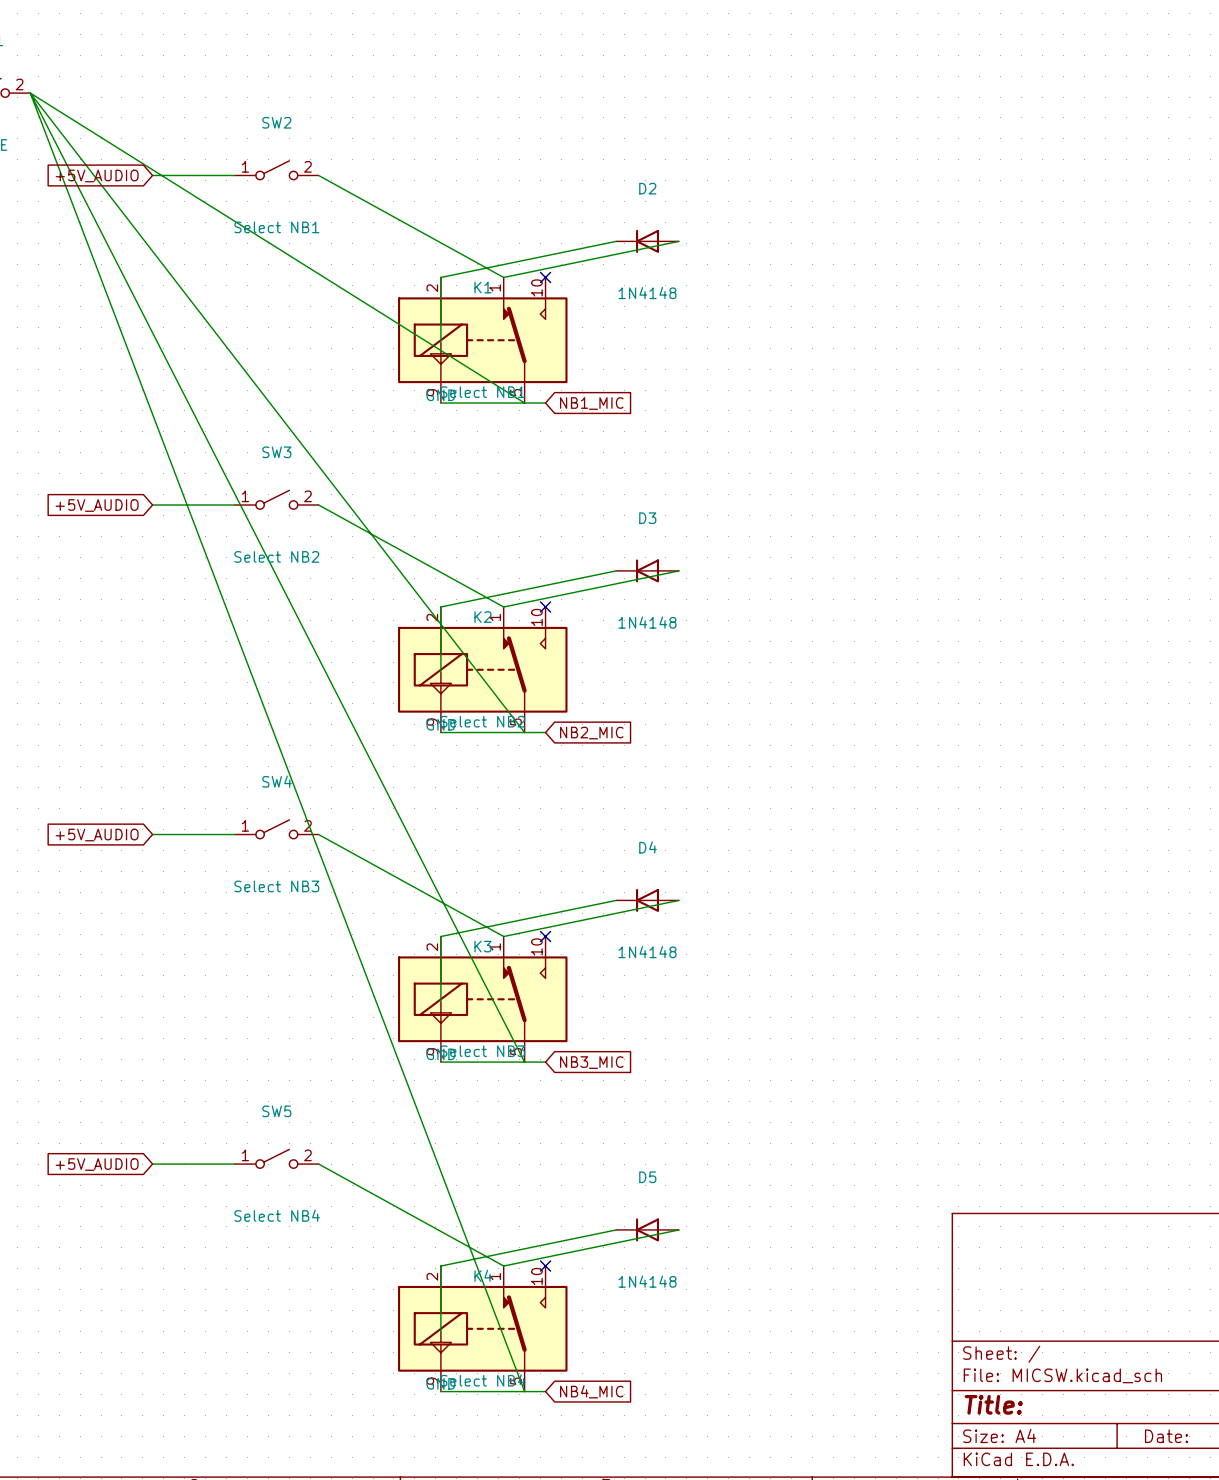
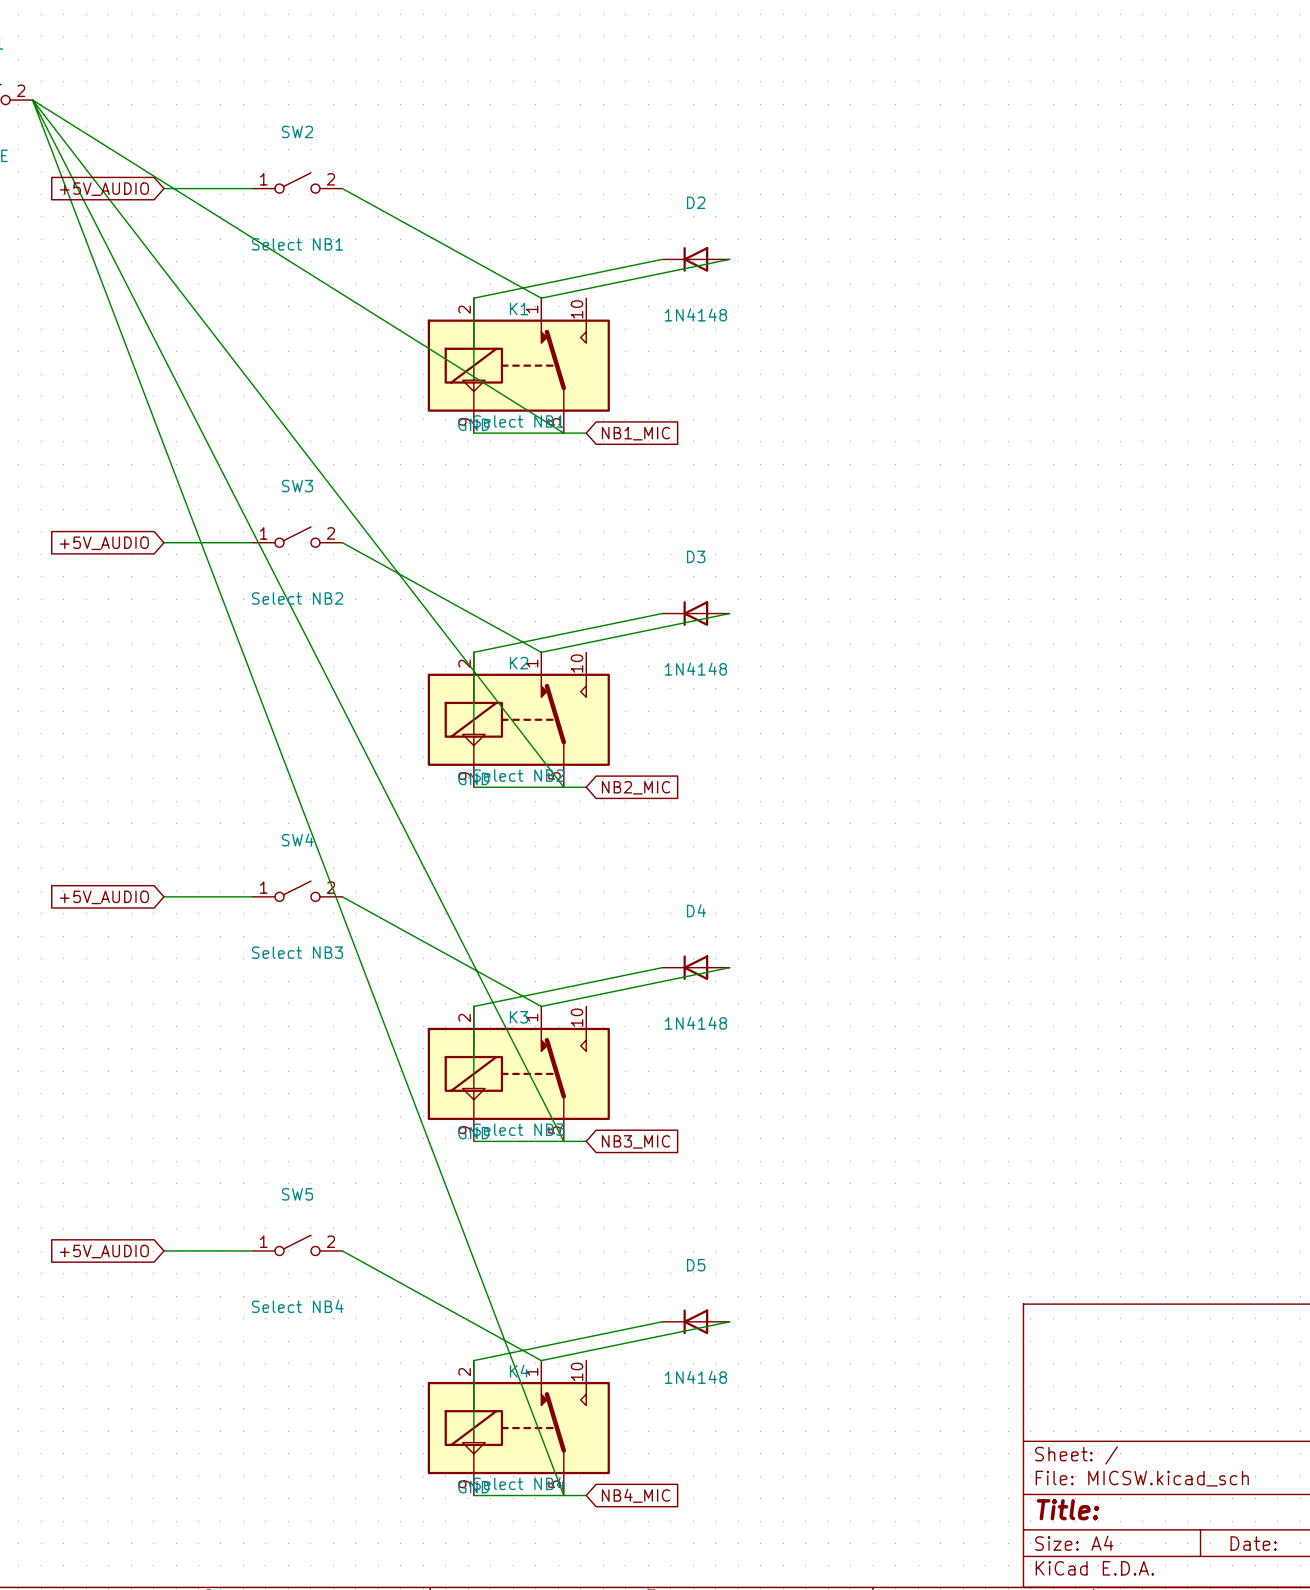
no-connect mark: (545, 277) -> none
no-connect mark: (545, 606) -> none
no-connect mark: (545, 936) -> none
no-connect mark: (545, 1266) -> none

